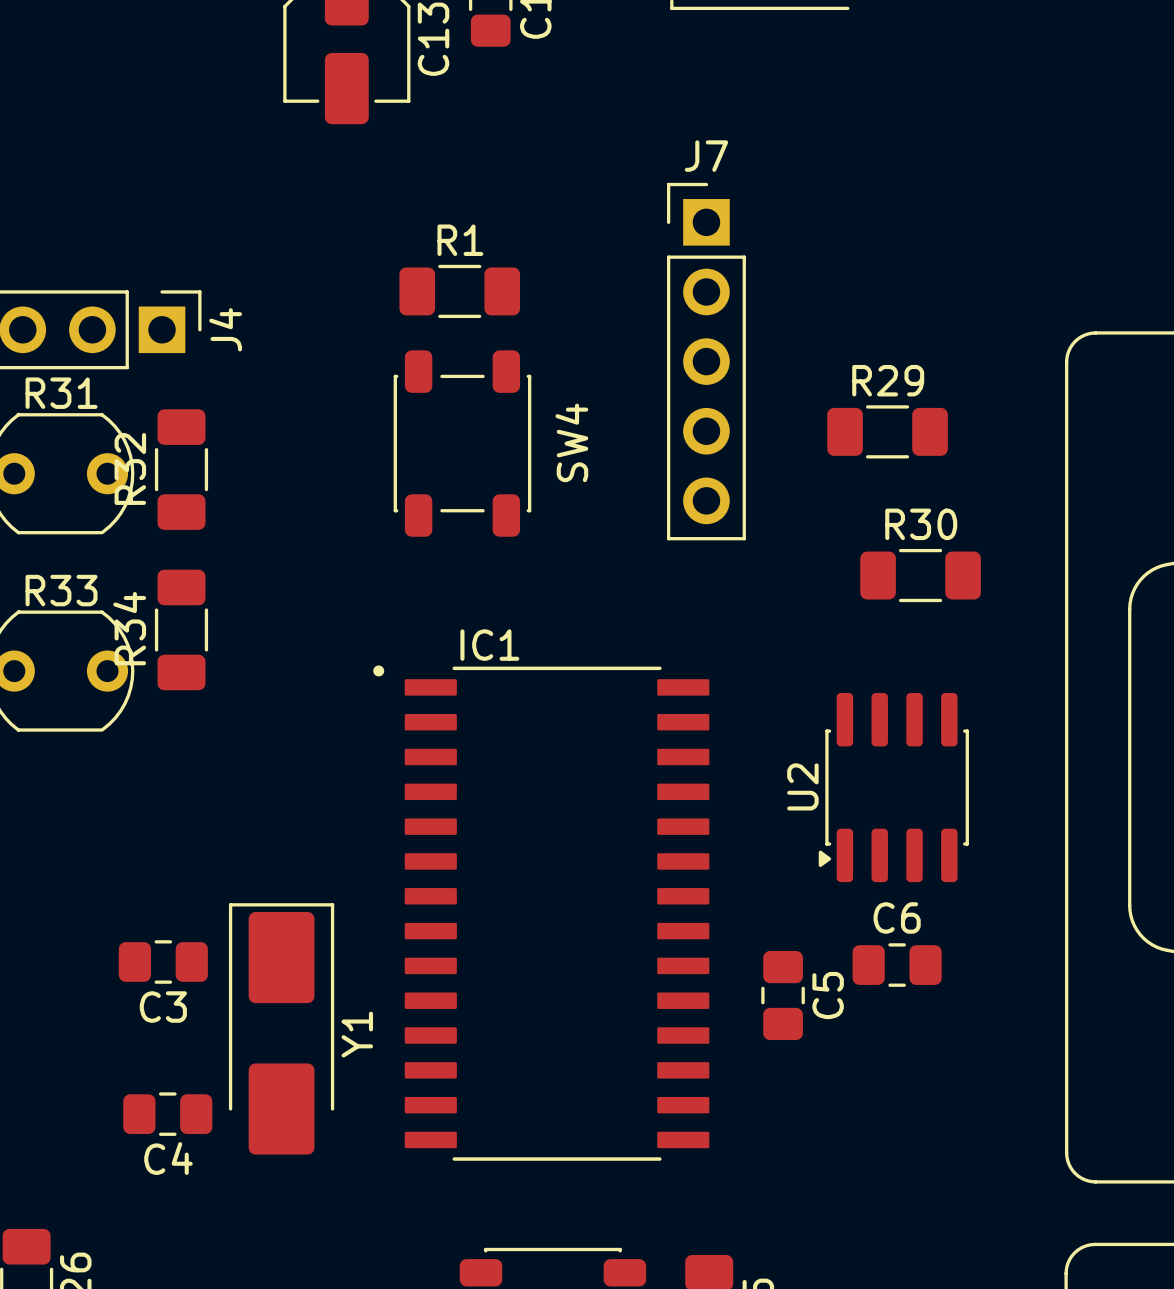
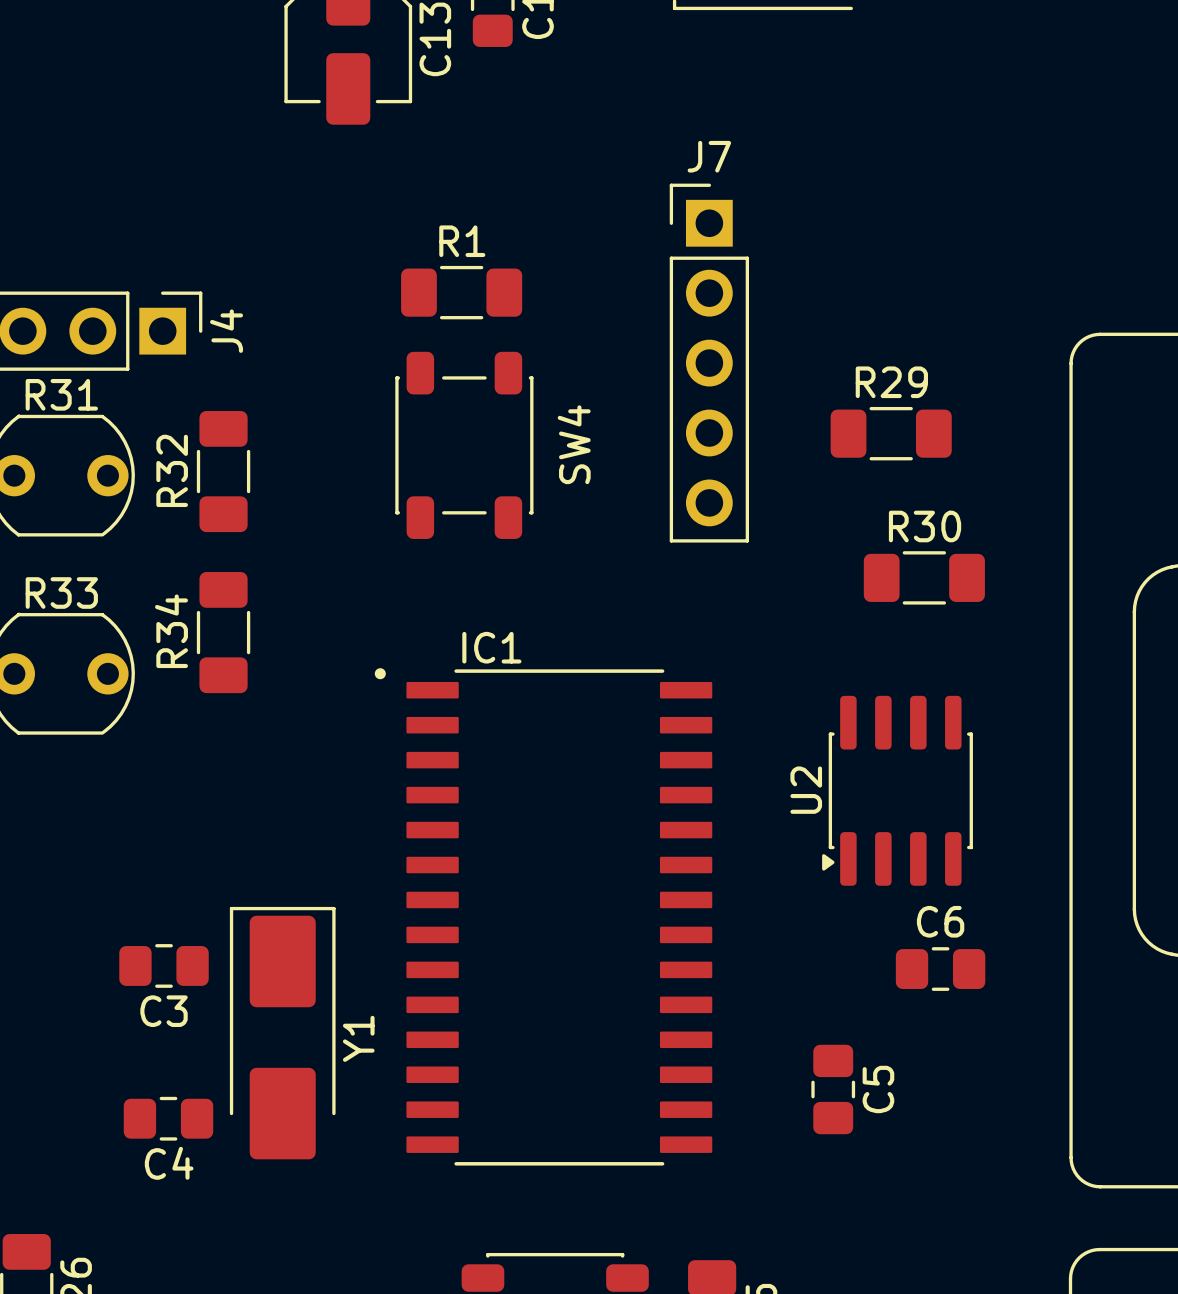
R32 position: (181, 469) -> (223, 471)
R34 position: (181, 629) -> (223, 632)
C6 position: (897, 965) -> (940, 969)
C5 position: (783, 995) -> (833, 1089)

